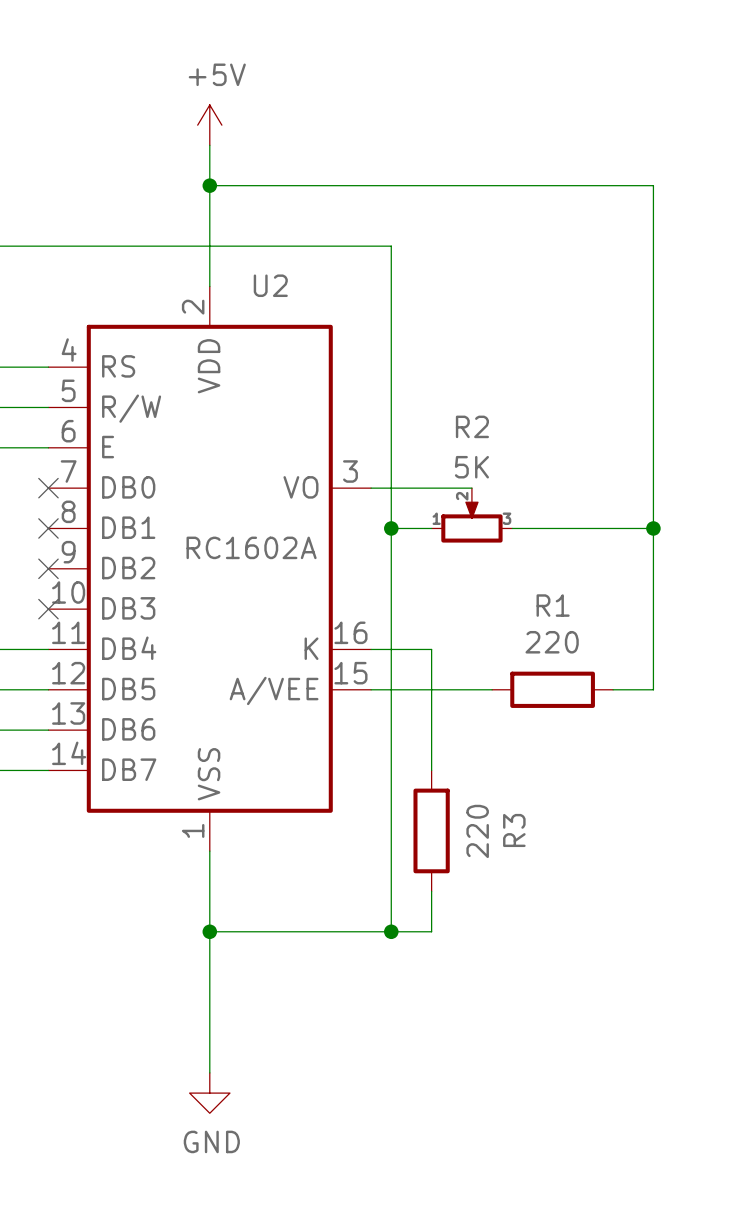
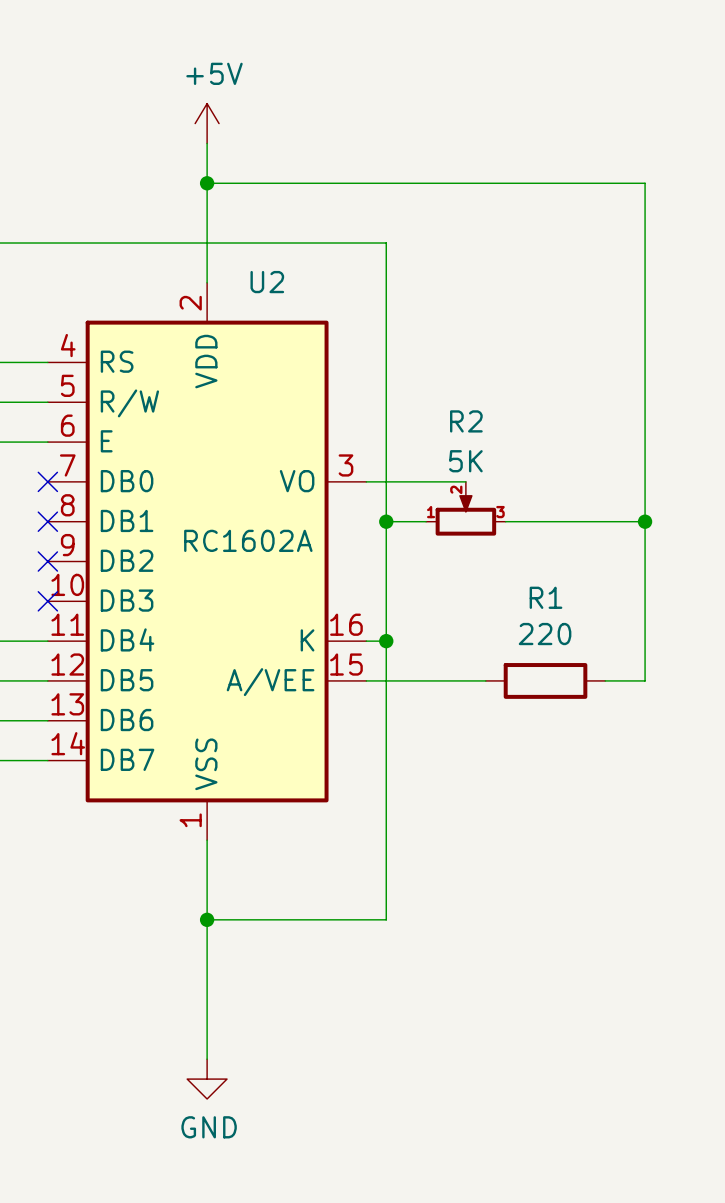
wire: (391, 649) (431, 649) (431, 770) -> none
junction: none -> (386, 641)
R3: 220 (431, 830) -> none
wire: (431, 891) (431, 931) (391, 931) -> none
junction: (391, 931) -> none

